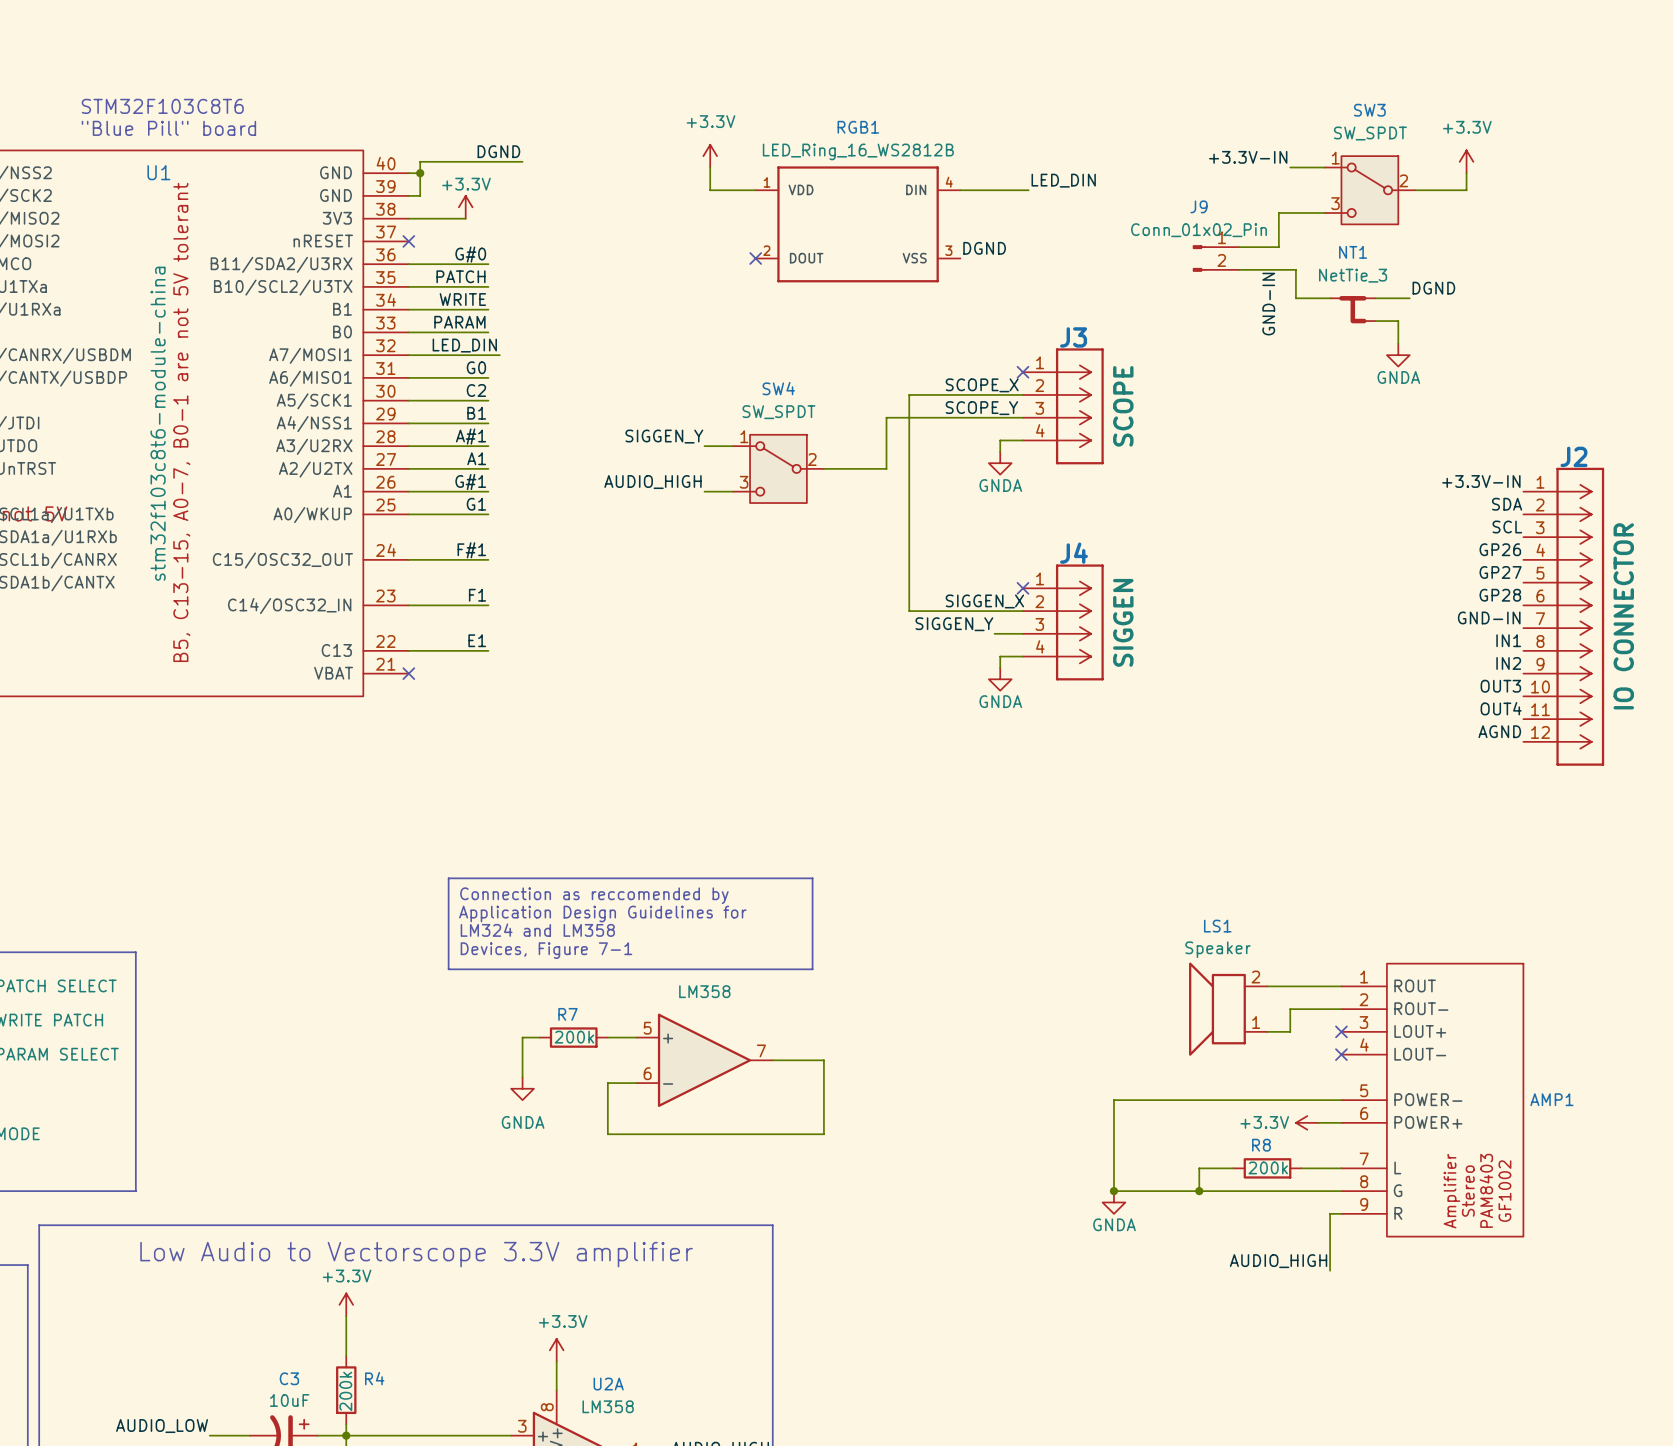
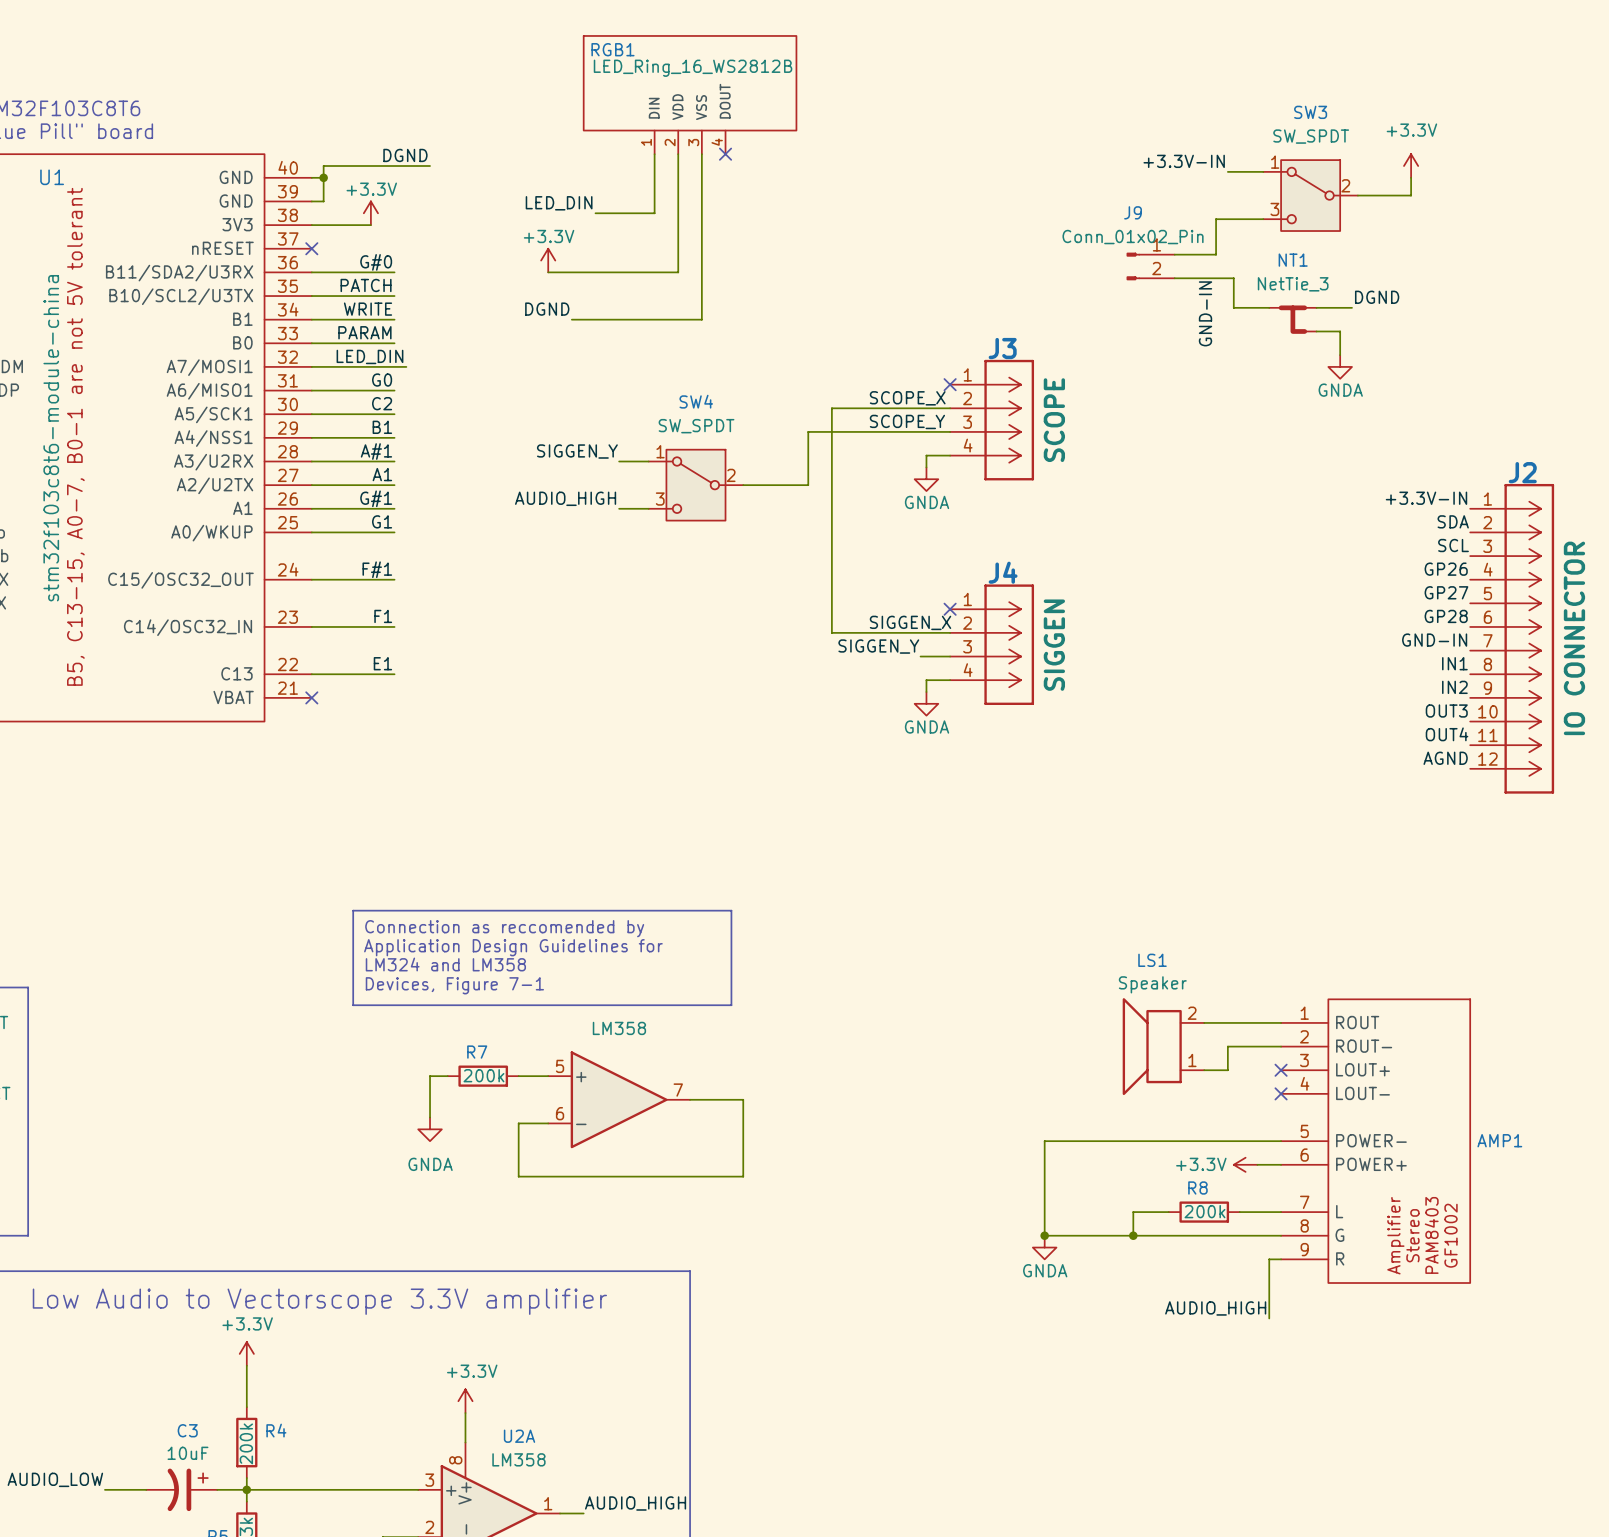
power symbol text position: +3.3V (711, 121) -> +3.3V (549, 236)
RGB1 name position: RGB1 (858, 127) -> RGB1 (612, 49)
wire: none -> (654, 154) (654, 213) (595, 213)
wire: none -> (678, 154) (678, 272) (548, 272)
wire: none -> (701, 154) (701, 319) (571, 319)
no-connect mark: none -> (725, 154)
RGB1 value position: LED_Ring_16_WS2812B (858, 151) -> LED_Ring_16_WS2812B (693, 68)
power symbol position: +3.3V (710, 156) -> +3.3V (548, 260)
RGB1 symbol: [755, 166, 961, 283] -> [583, 35, 797, 155]
wire: (710, 167) (710, 190) (755, 190) -> none
label: LED_DIN (1063, 180) -> none
wire: (960, 190) (1028, 190) -> none
label: none -> LED_DIN (559, 203)
label: DGND (984, 248) -> none
no-connect mark: (755, 258) -> none
label: none -> DGND (547, 309)

